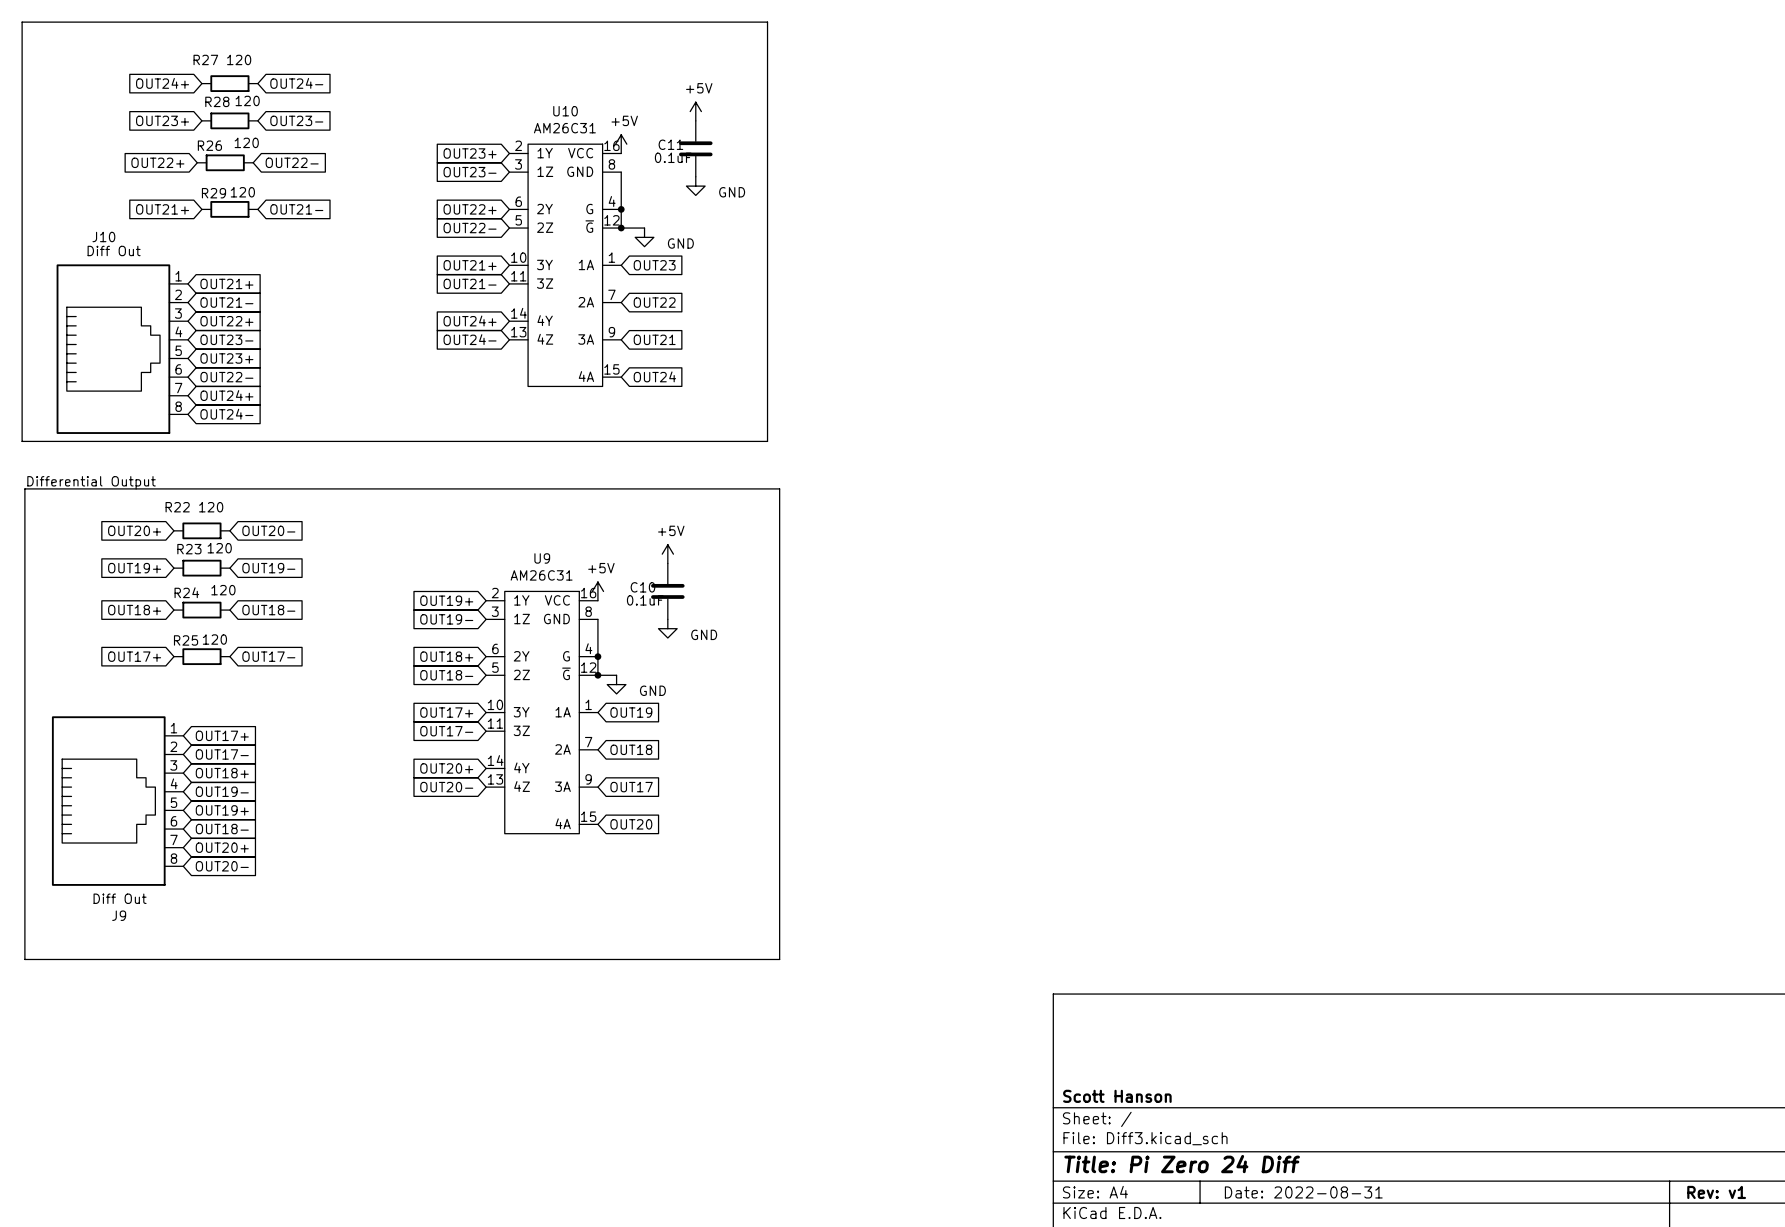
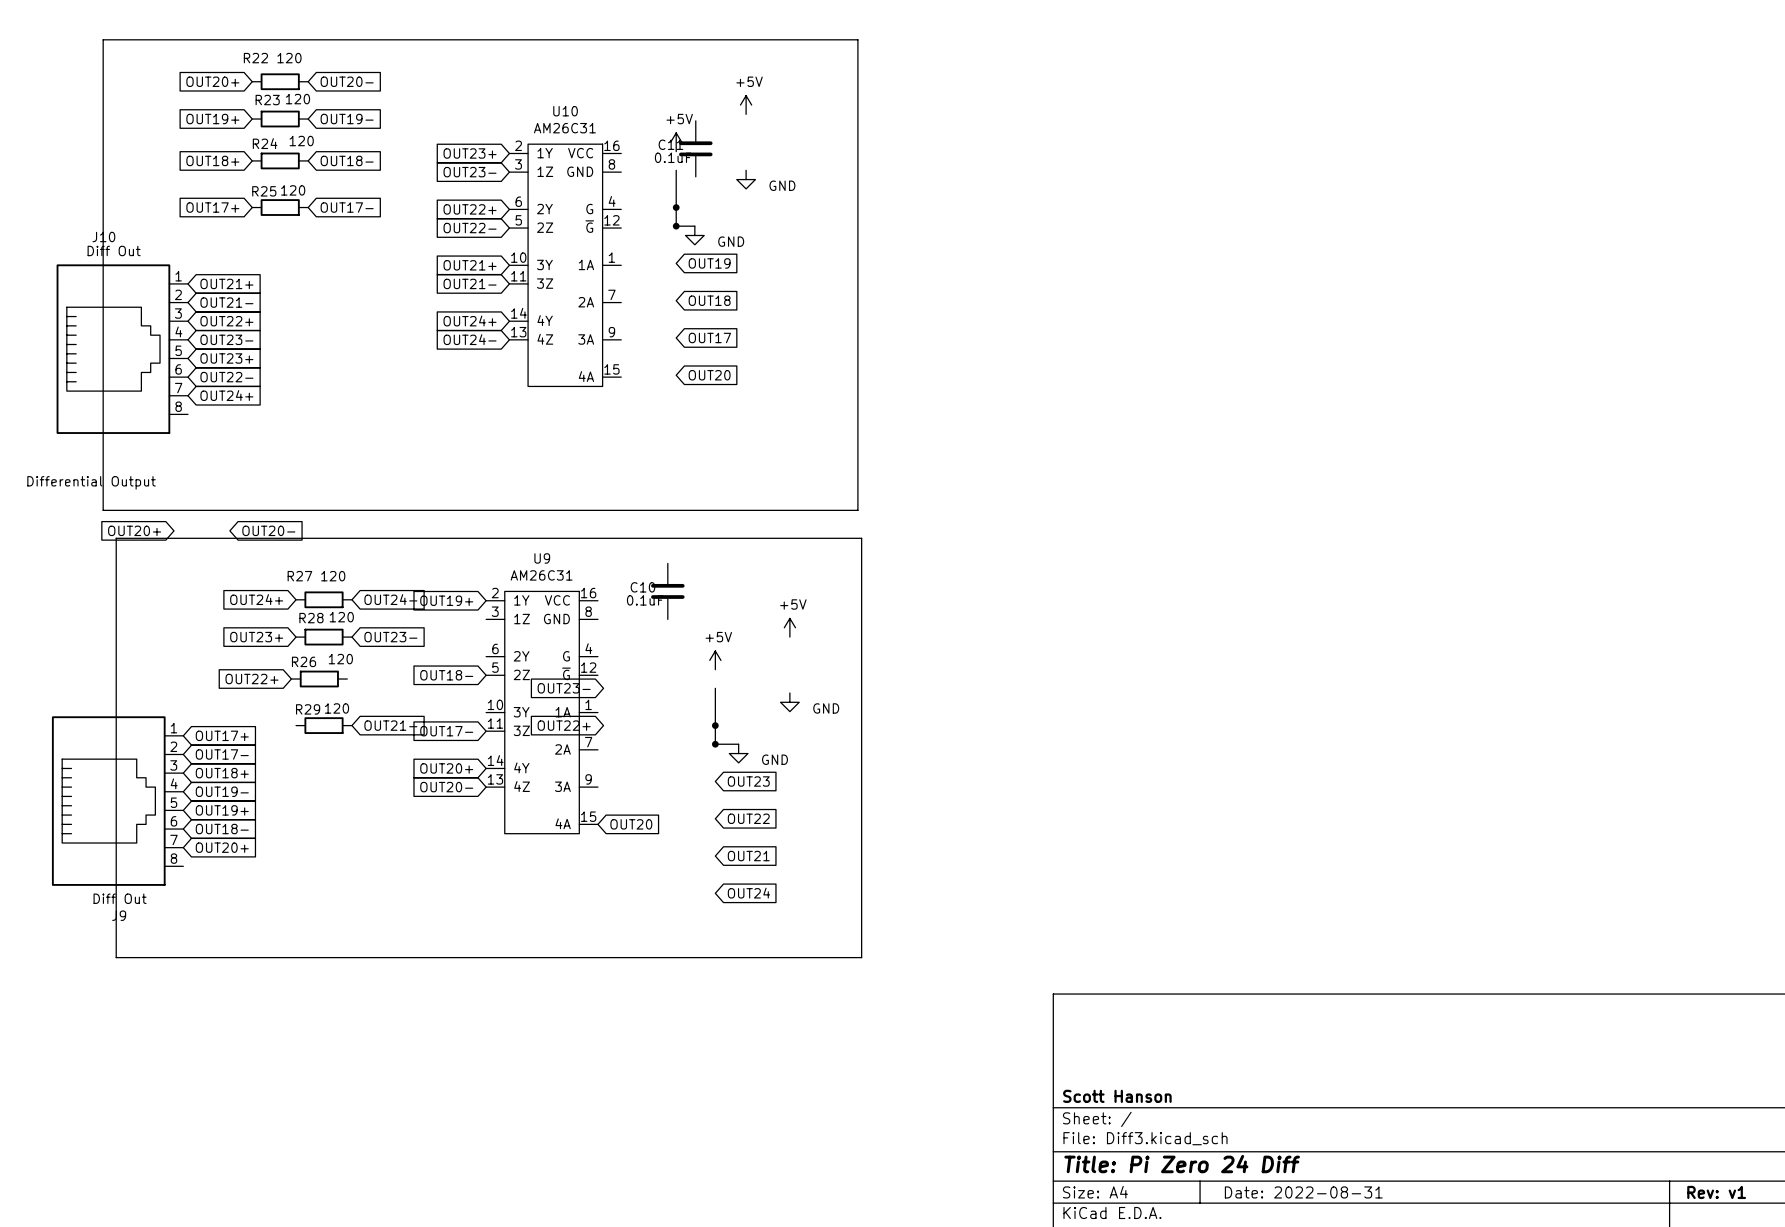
line: (22, 22) (22, 441) (767, 441) (767, 22) (22, 22) -> (103, 39) (103, 510) (857, 510) (857, 39) (103, 39)
global label: none -> OUT20- (347, 81)
global label: OUT24+ (162, 83) -> none
R27 position: (229, 83) -> (324, 599)
global label: OUT24- (296, 83) -> OUT20+ (212, 81)
power symbol: none -> +5V (746, 105)
power symbol: +5V (695, 111) -> none
global label: none -> OUT19- (347, 119)
global label: OUT23+ (162, 120) -> none
R28 position: (229, 120) -> (324, 637)
global label: OUT23- (296, 120) -> OUT19+ (212, 119)
power symbol: none -> +5V (676, 142)
power symbol: +5V (621, 144) -> none
global label: none -> OUT18- (347, 160)
global label: OUT22+ (157, 162) -> none
R26 position: (225, 162) -> (319, 679)
global label: OUT22- (292, 162) -> OUT18+ (212, 160)
wire: none -> (676, 170) (676, 226) (694, 226)
wire: (621, 172) (621, 228) (644, 228) -> none
power symbol: none -> GND (746, 179)
power symbol: GND (695, 186) -> none
global label: none -> OUT17- (347, 207)
junction: none -> (676, 207)
global label: OUT21+ (162, 209) -> none
R29 position: (229, 209) -> (324, 725)
global label: OUT21- (296, 209) -> OUT17+ (212, 207)
junction: (621, 209) -> none
junction: none -> (676, 226)
junction: (621, 228) -> none
power symbol: none -> GND (694, 235)
power symbol: GND (644, 237) -> none
global label: none -> OUT19 (709, 263)
global label: OUT23 (654, 265) -> none
global label: none -> OUT18 (709, 300)
global label: OUT22 (654, 302) -> none
global label: OUT21 (654, 339) -> OUT17 (709, 337)
global label: OUT24 (654, 376) -> OUT20 (709, 375)
global label: OUT24- (226, 414) -> none
line: (24, 488) (24, 959) (779, 959) (779, 488) (24, 488) -> (116, 538) (116, 957) (861, 957) (861, 538) (116, 538)
R22 position: (201, 530) -> (280, 81)
power symbol: +5V (667, 554) -> none
global label: OUT19+ (134, 568) -> none
R23 position: (201, 568) -> (280, 119)
global label: OUT19- (268, 568) -> none
power symbol: +5V (597, 591) -> none
global label: none -> OUT24+ (256, 599)
global label: none -> OUT24- (390, 599)
global label: OUT18+ (134, 610) -> none
R24 position: (201, 610) -> (280, 160)
global label: OUT18- (268, 610) -> none
global label: OUT19- (446, 619) -> none
wire: (597, 619) (597, 675) (616, 675) -> none
power symbol: none -> +5V (789, 627)
power symbol: GND (667, 628) -> none
global label: none -> OUT23+ (256, 637)
global label: none -> OUT23- (390, 637)
global label: OUT17+ (134, 656) -> none
R25 position: (201, 656) -> (280, 207)
global label: OUT17- (268, 656) -> none
global label: OUT18+ (446, 656) -> none
junction: (597, 656) -> none
power symbol: none -> +5V (715, 660)
junction: (597, 675) -> none
global label: none -> OUT22+ (252, 679)
power symbol: GND (616, 684) -> none
global label: none -> OUT23- (564, 688)
wire: none -> (715, 688) (715, 744) (738, 744)
power symbol: none -> GND (789, 702)
global label: OUT17+ (446, 712) -> OUT21- (390, 725)
global label: OUT19 (631, 712) -> none
global label: none -> OUT22+ (564, 725)
junction: none -> (715, 725)
junction: none -> (715, 744)
global label: OUT18 (631, 749) -> none
power symbol: none -> GND (738, 753)
global label: none -> OUT23 (748, 781)
global label: OUT17 (631, 787) -> none
global label: none -> OUT22 (748, 818)
global label: none -> OUT21 (748, 856)
global label: OUT20- (222, 866) -> none
global label: none -> OUT24 (748, 893)

